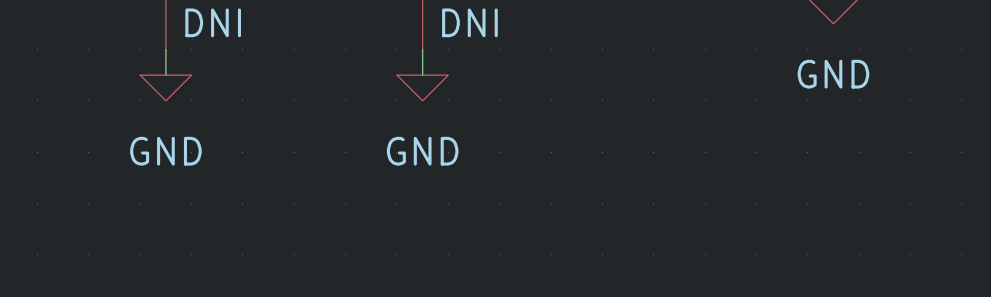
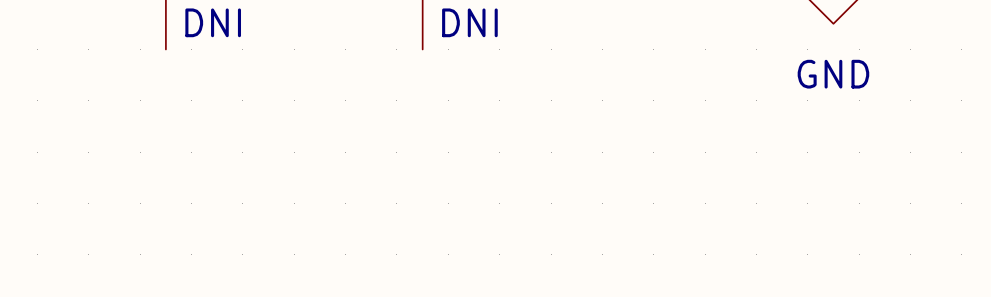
wire: (165, 49) (165, 75) -> none
wire: (422, 49) (422, 75) -> none
power symbol: GND (165, 87) -> none
power symbol: GND (422, 87) -> none

